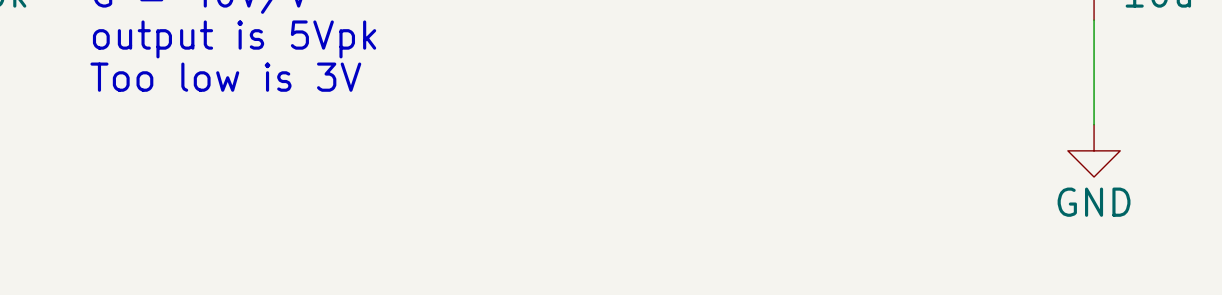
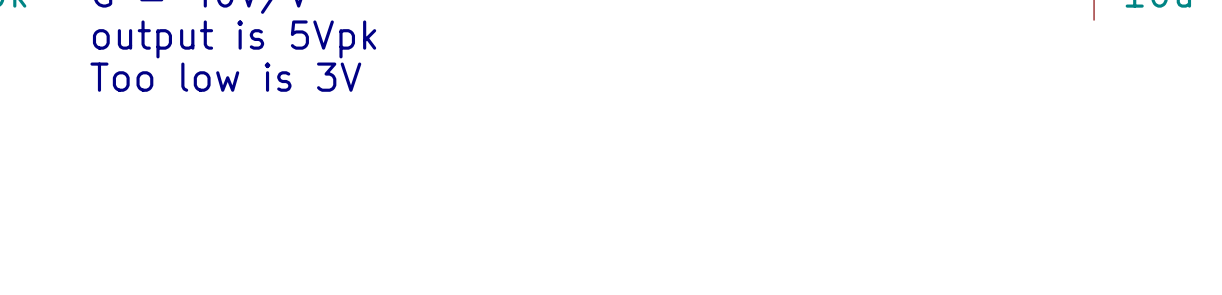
wire: (1094, 20) (1094, 124) -> none
power symbol: GND (1094, 150) -> none

